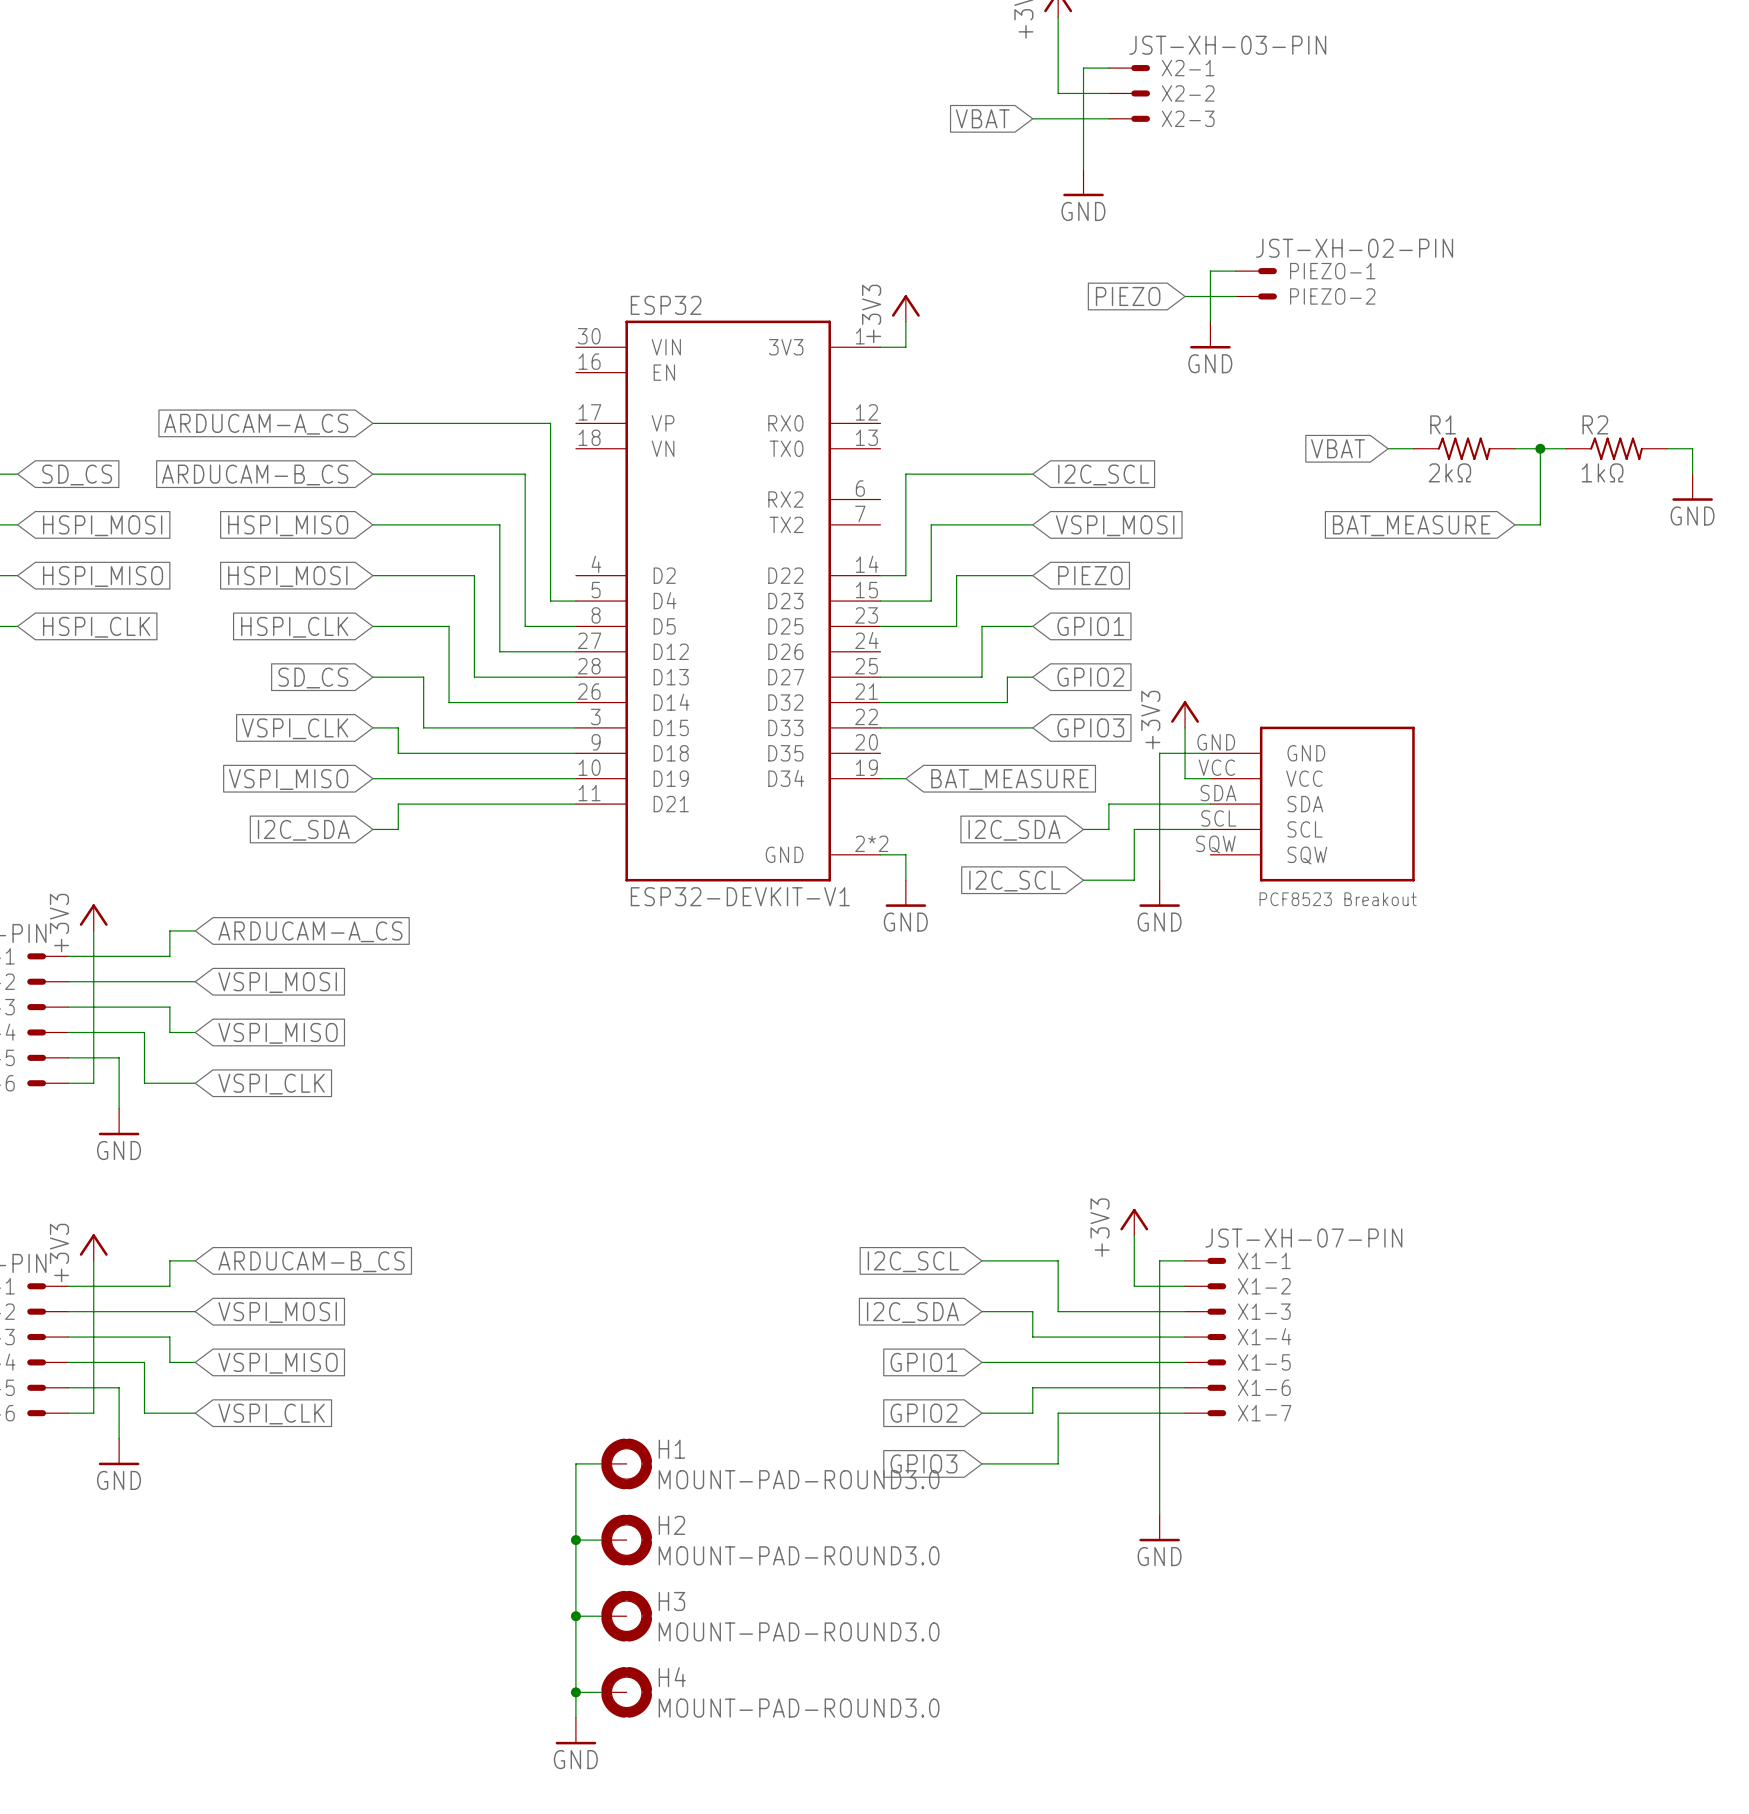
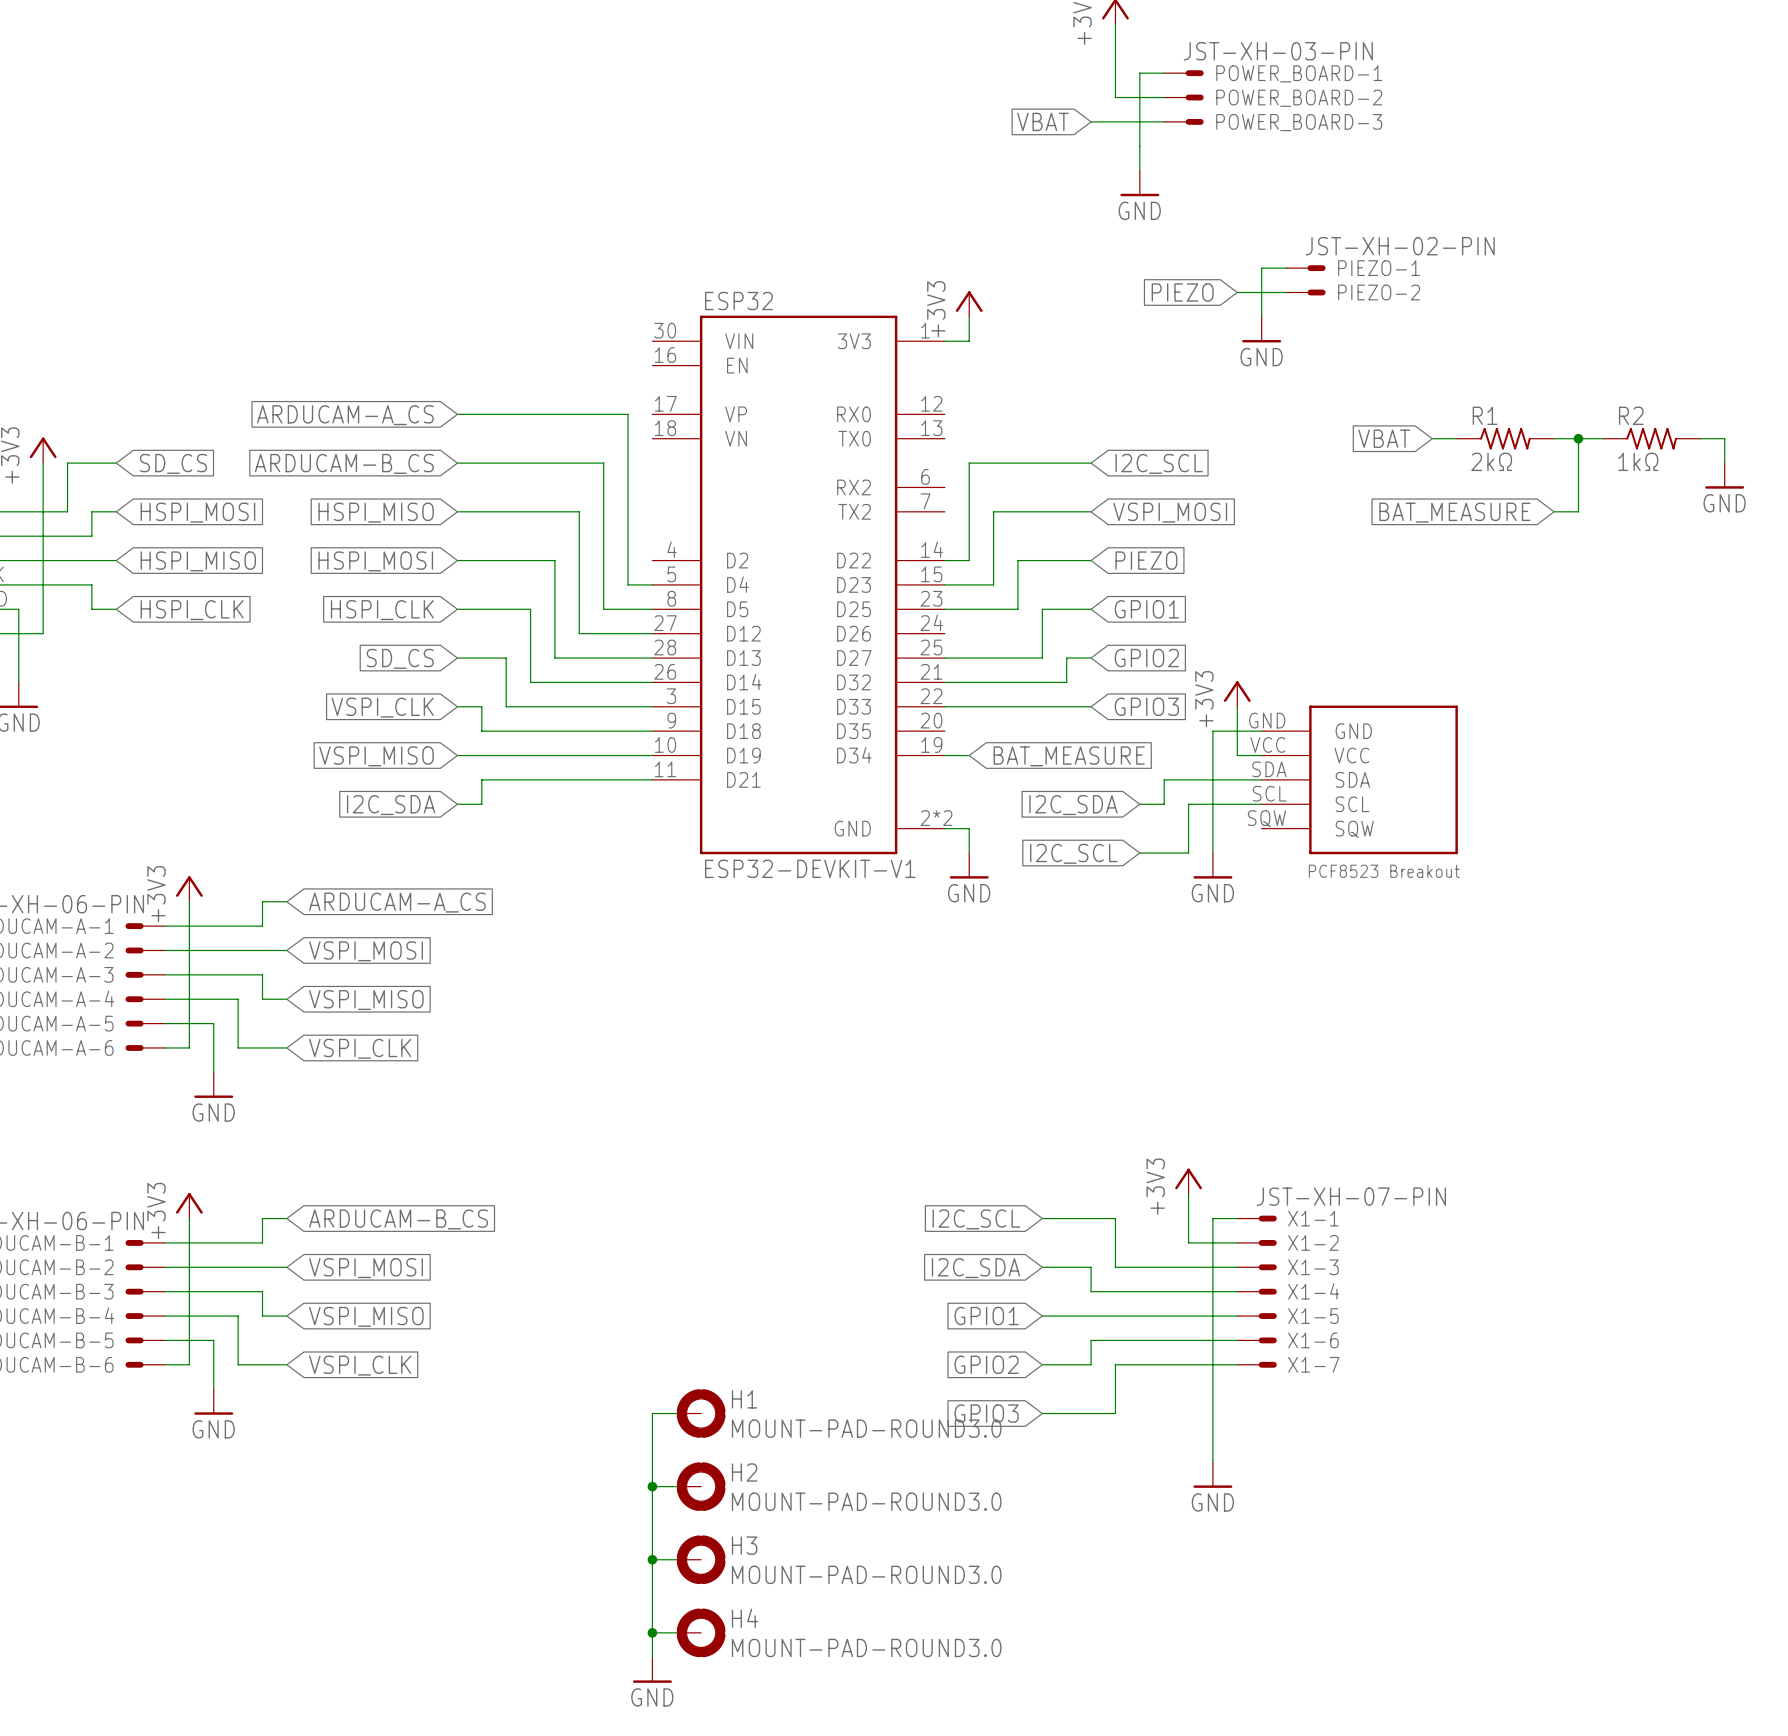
X2-1 name: X2-1 (1188, 68) -> POWER_BOARD-1 (1299, 73)
X2-2 name: X2-2 (1188, 93) -> POWER_BOARD-2 (1299, 98)
X2-3 name: X2-3 (1188, 118) -> POWER_BOARD-3 (1299, 122)

